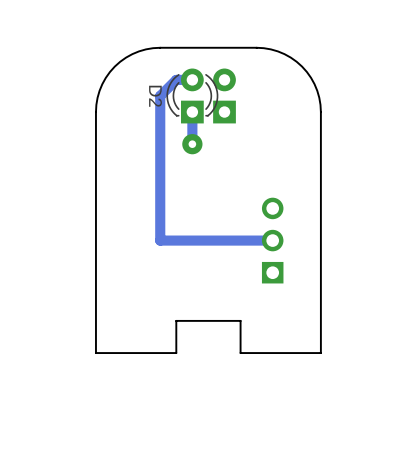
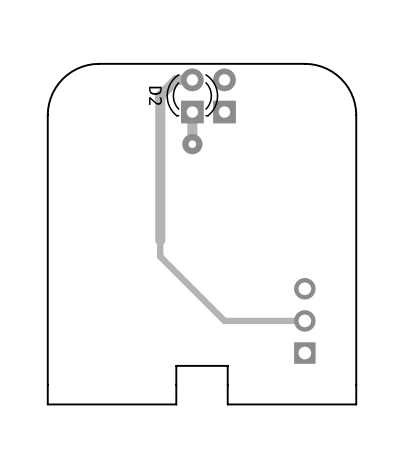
board edge: (256, 47) (145, 49) (132, 54) (120, 61) (109, 71) (102, 84) (97, 97) (95, 112) (95, 353) (176, 353) (176, 320) (240, 320) (240, 353) (320, 353) (320, 112) (319, 97) (311, 77) (296, 61) (277, 51) (256, 47) -> (304, 63) (321, 66) (336, 75) (348, 87) (355, 109) (356, 404) (227, 404) (227, 365) (176, 365) (176, 404) (47, 404) (47, 115) (50, 98) (58, 83) (71, 71) (93, 64) (304, 63)
track: (272, 240) (160, 240) -> (304, 320) (224, 320) (160, 256) (160, 240)
part position: (272, 240) -> (304, 320)

